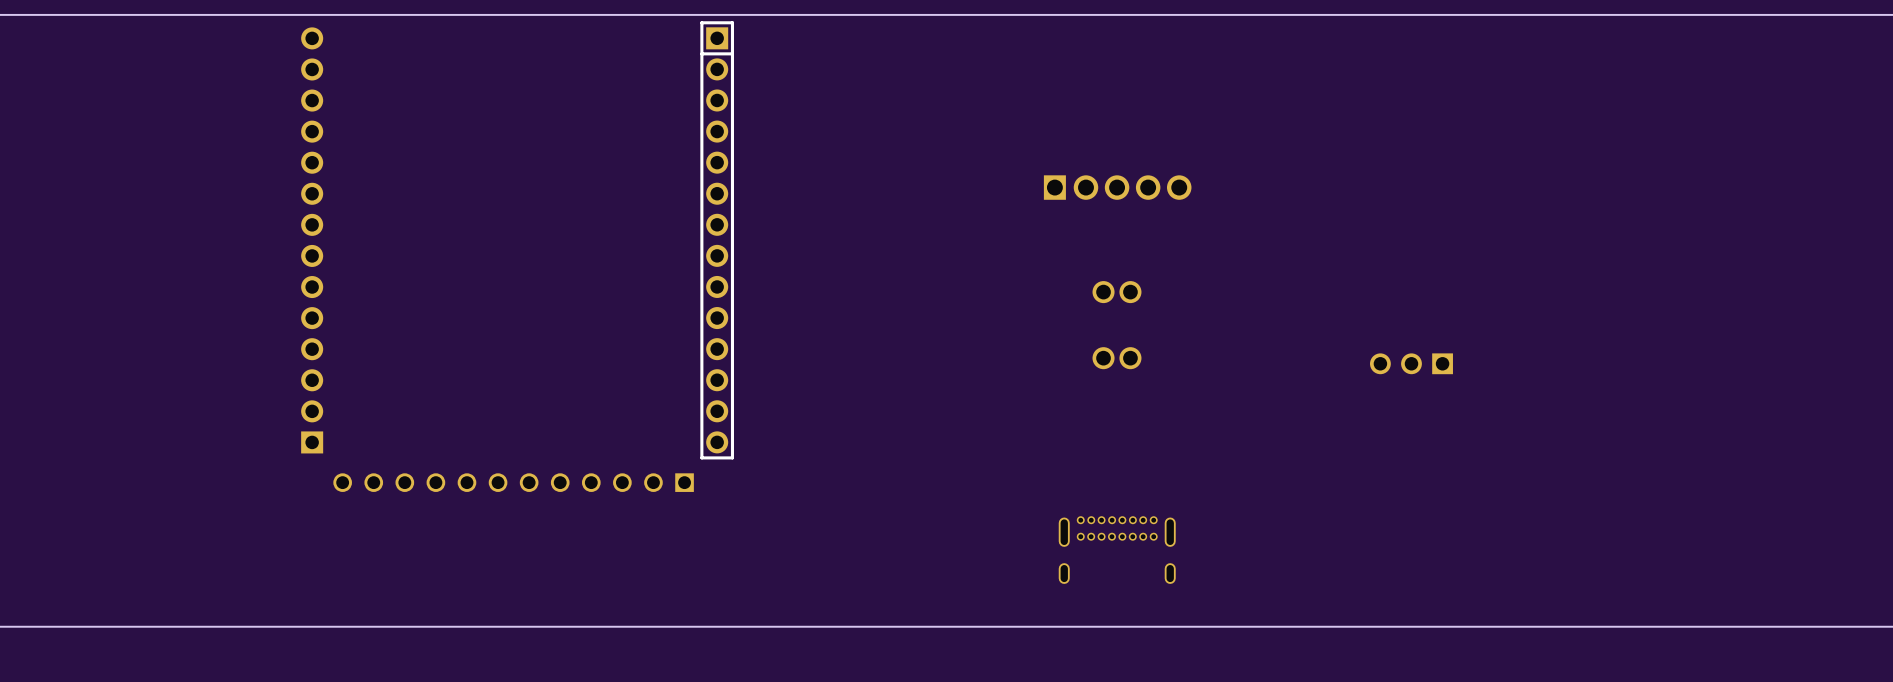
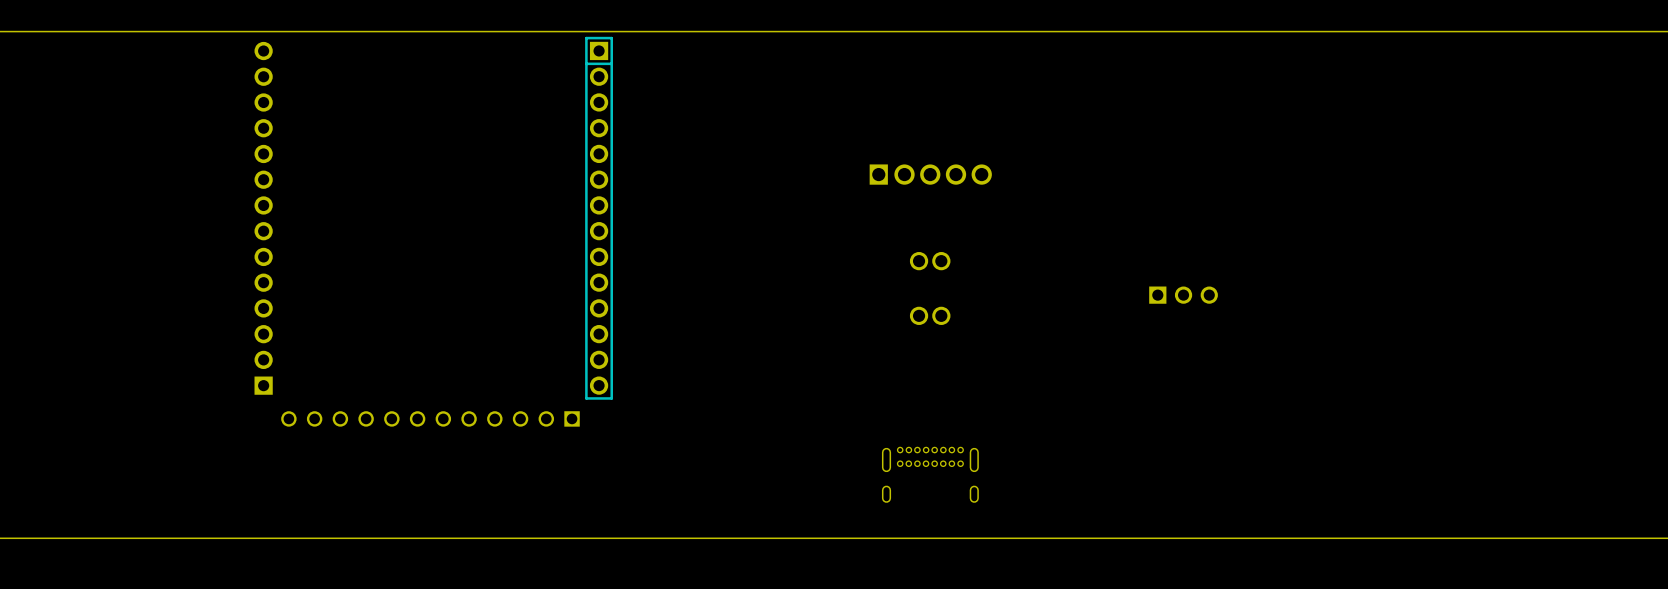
part rotation: 0° (1411, 363) -> 180° (1183, 295)

